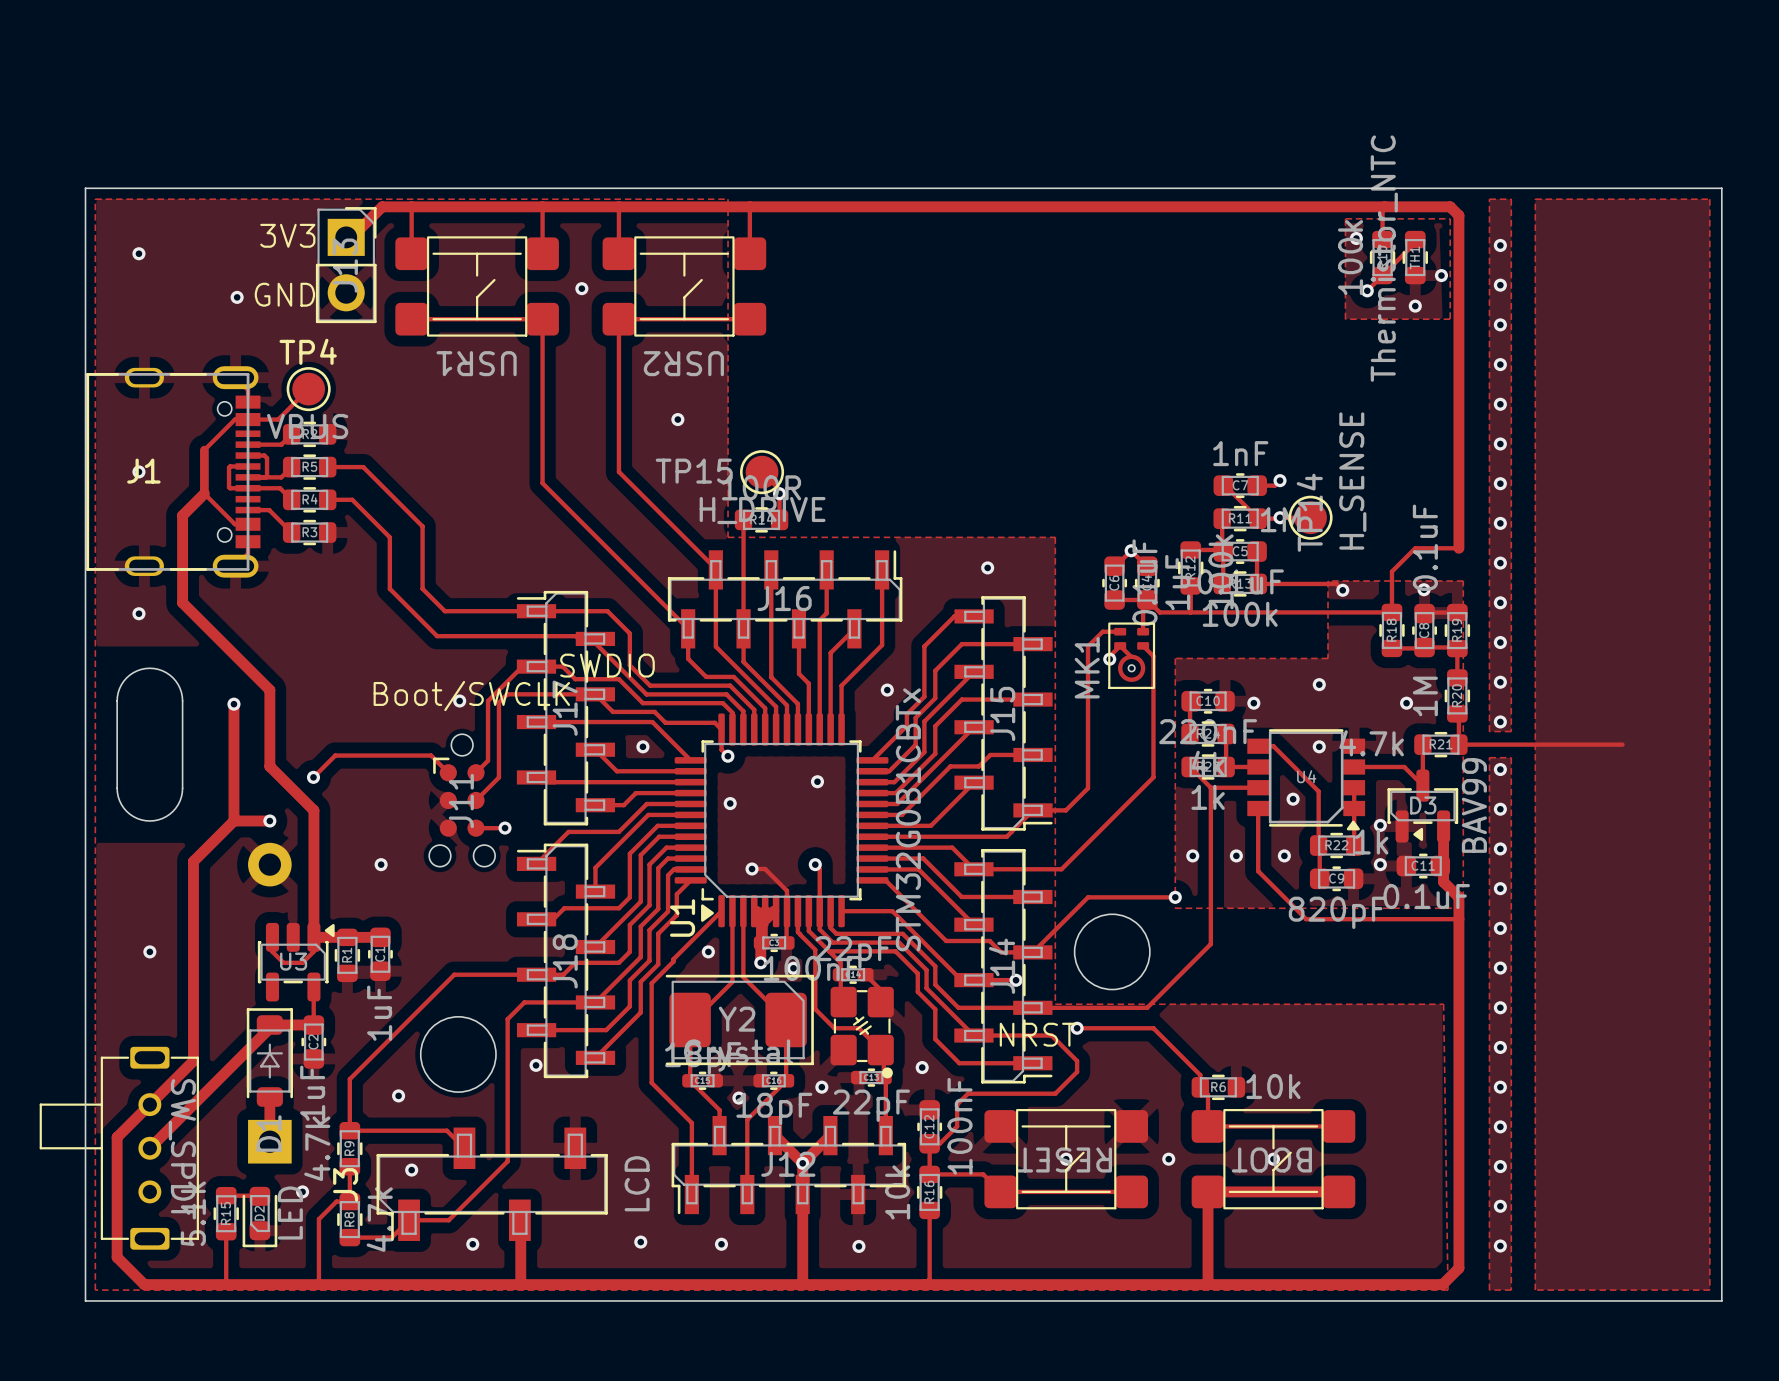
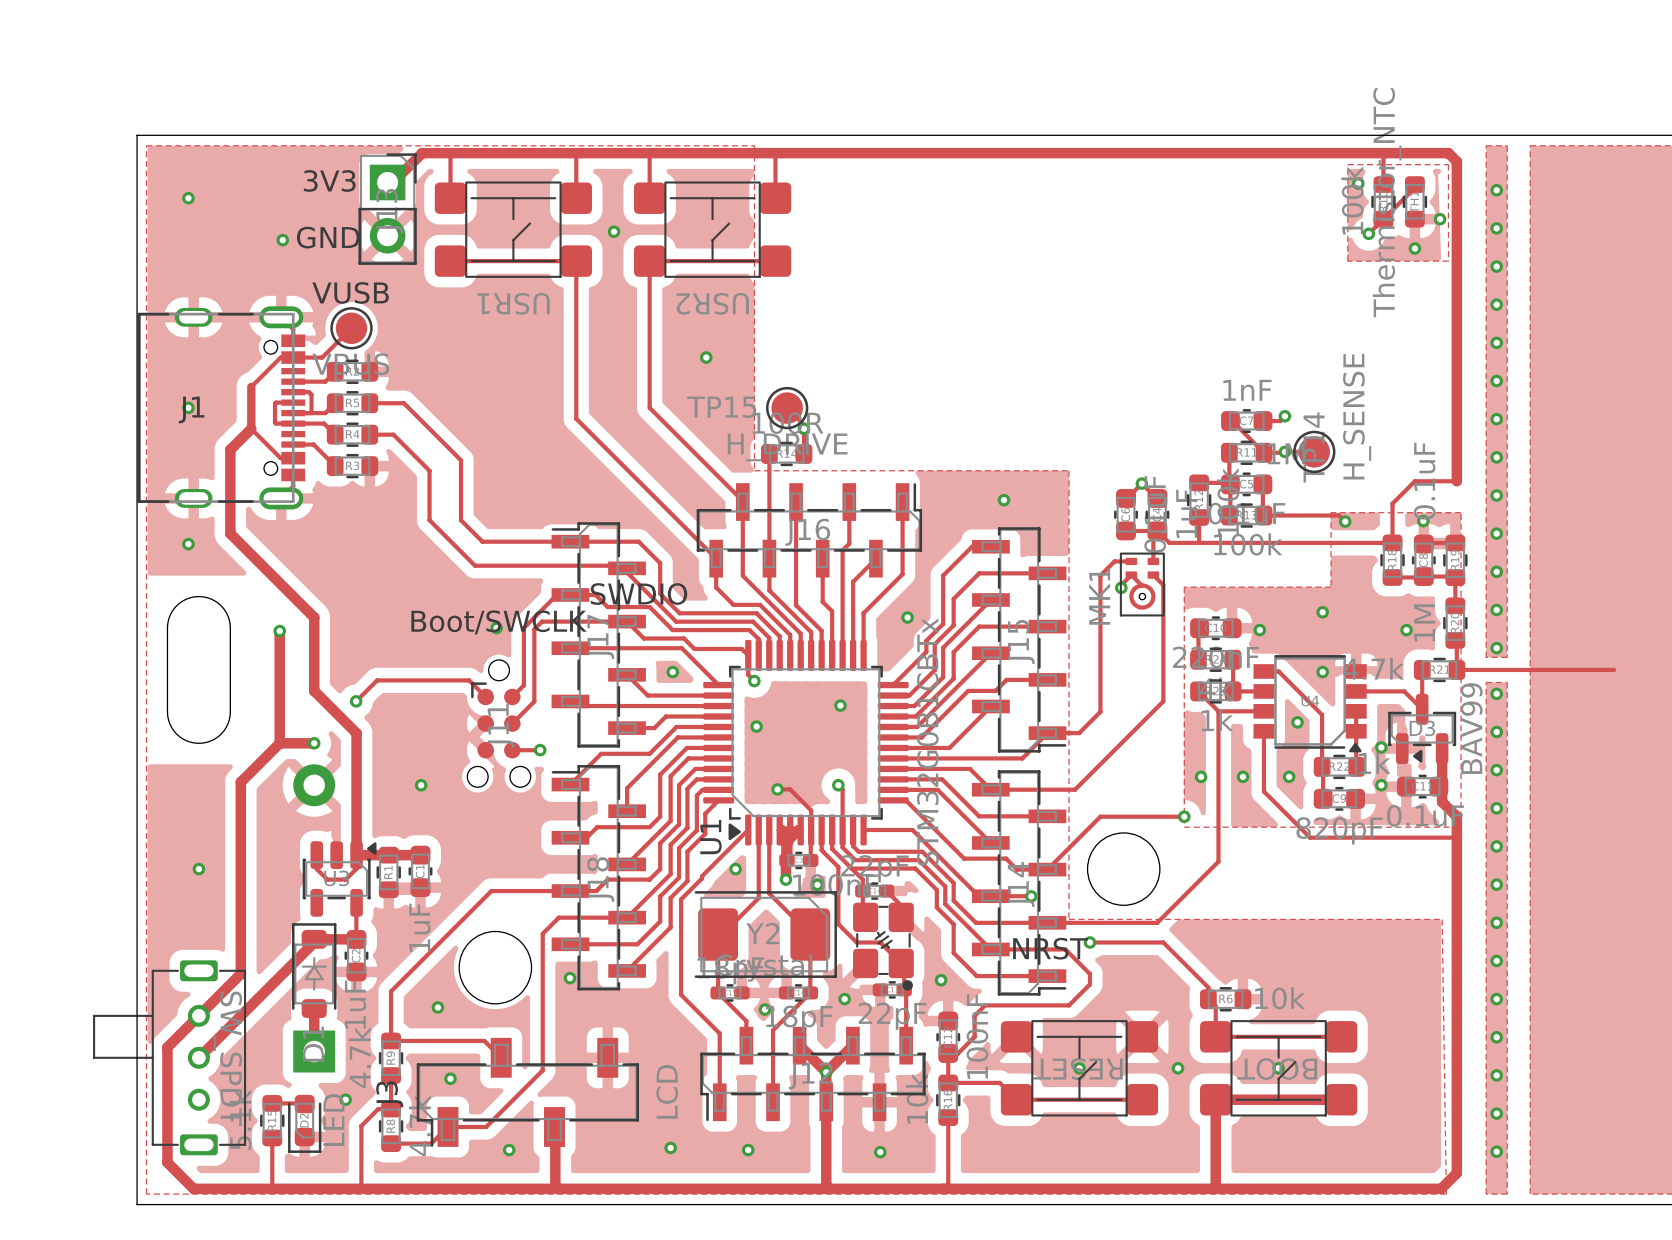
TP4 name: TP4 (308, 351) -> VUSB (350, 292)

